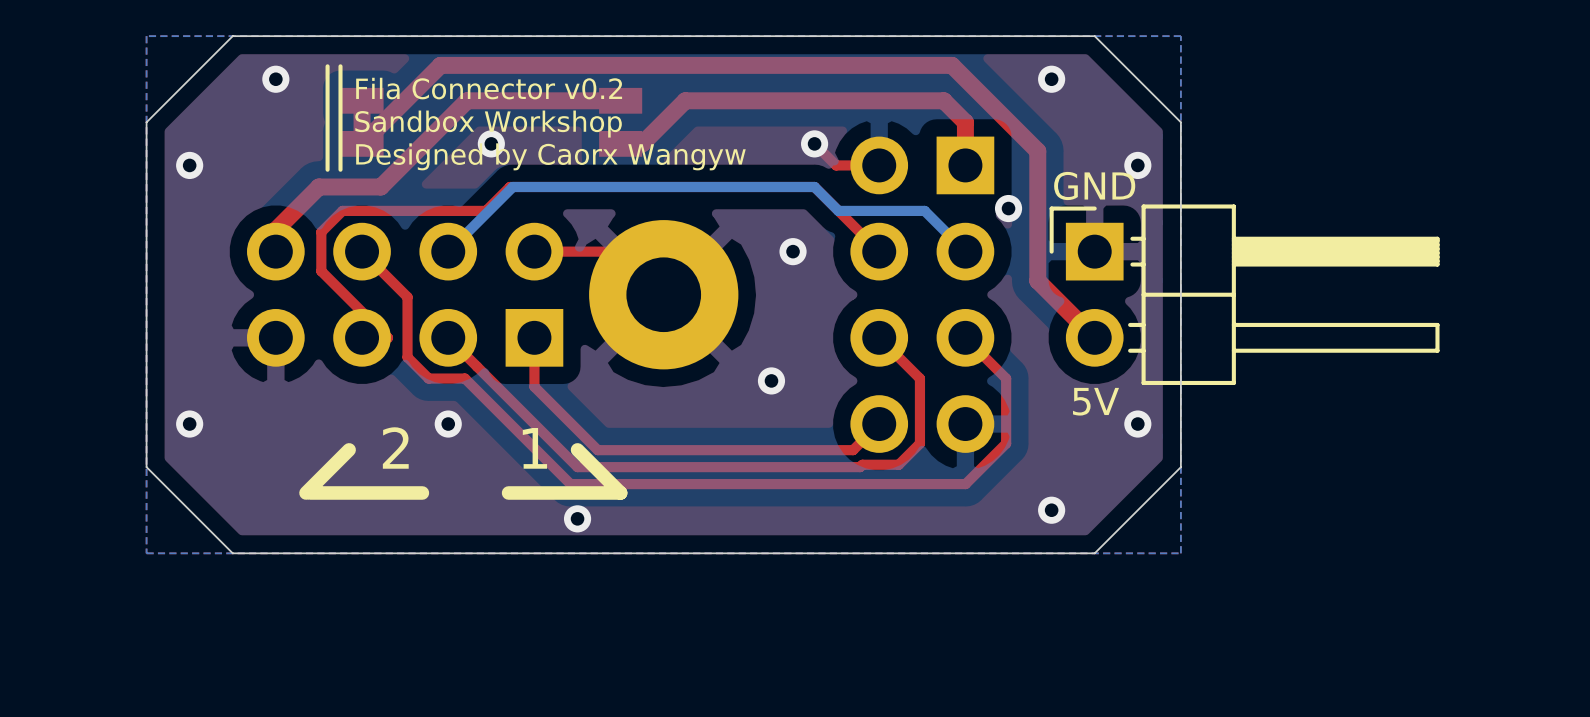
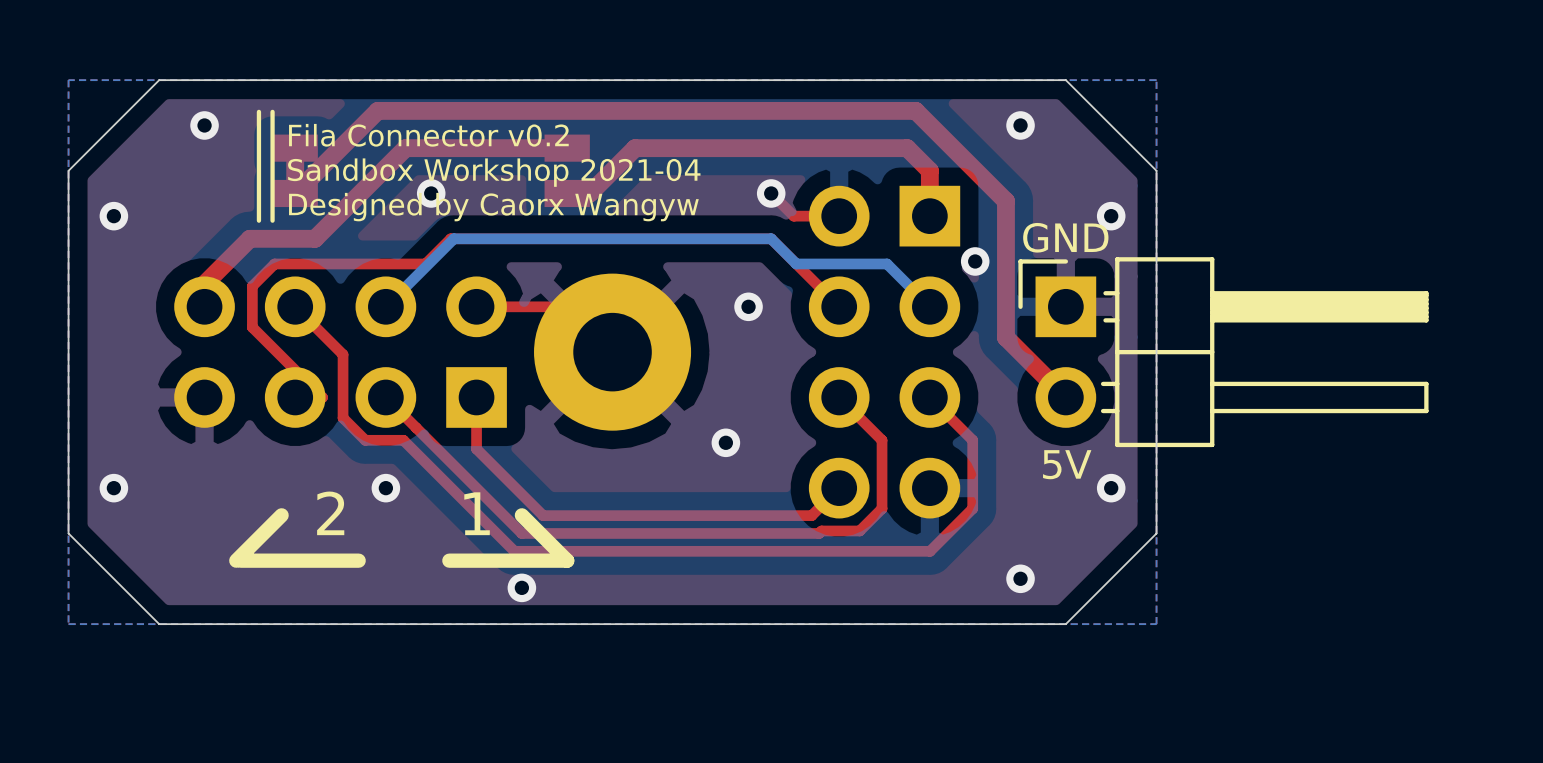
text: Sandbox Workshop (488, 124) -> Sandbox Workshop 2021-04 (494, 172)

